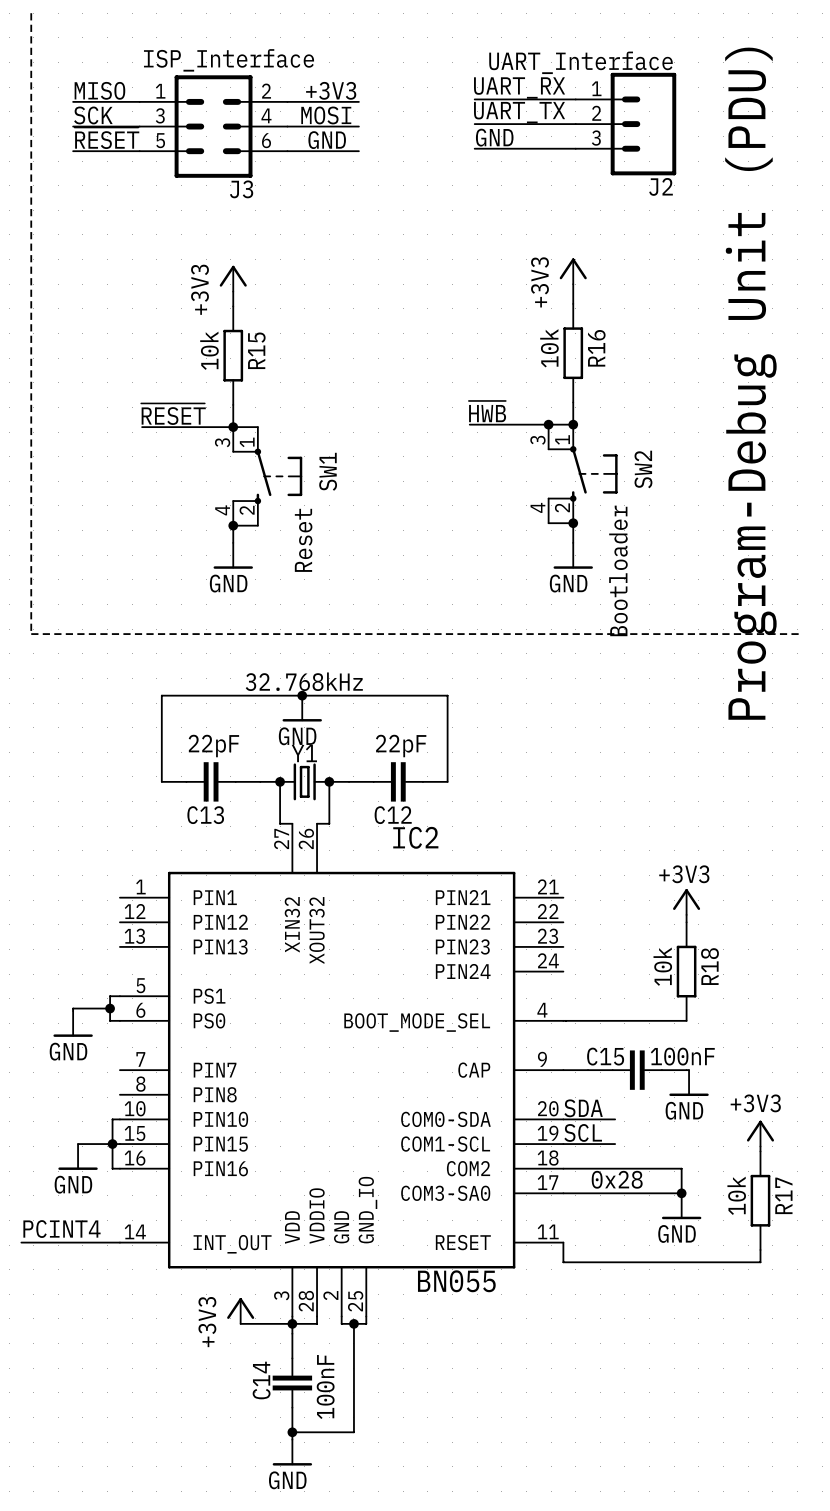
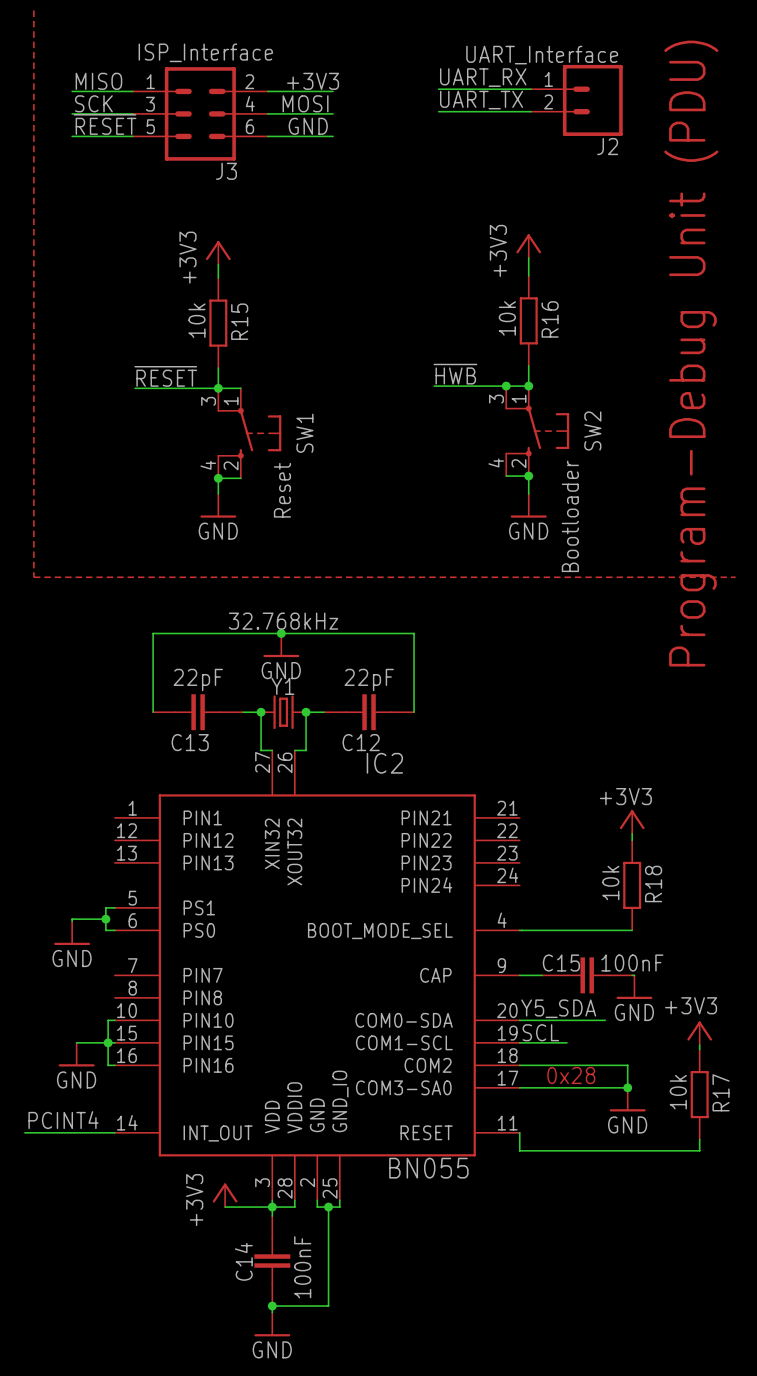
J2 symbol: [575, 72, 677, 176] -> [530, 64, 623, 136]
label: GND (494, 137) -> none
wire: (474, 148) (575, 148) -> none
label: SDA (583, 1108) -> Y5_SDA (558, 1008)
wire: none -> (566, 1020) (605, 1020)

